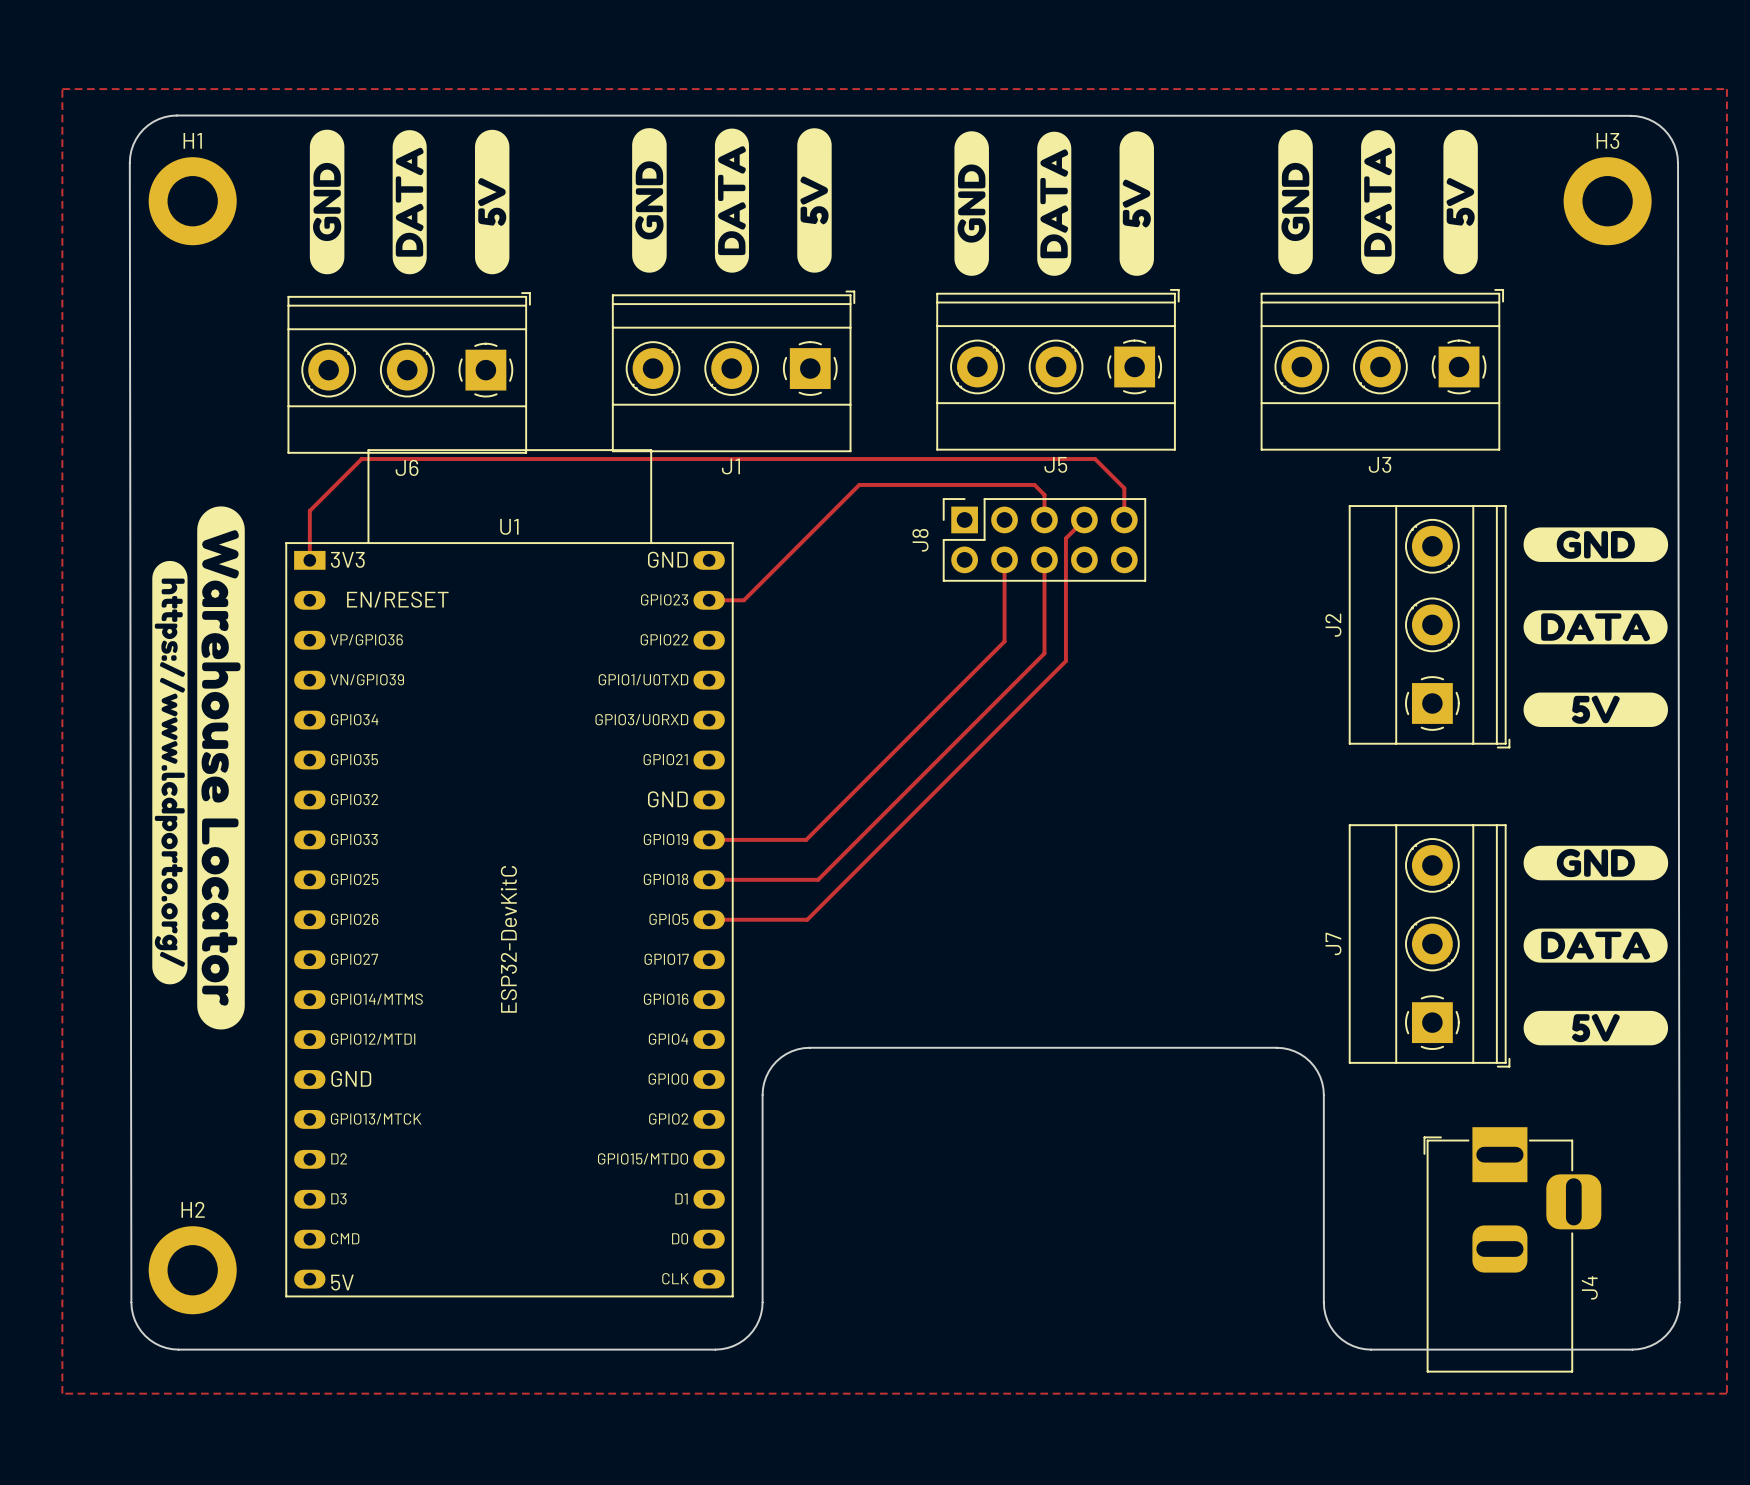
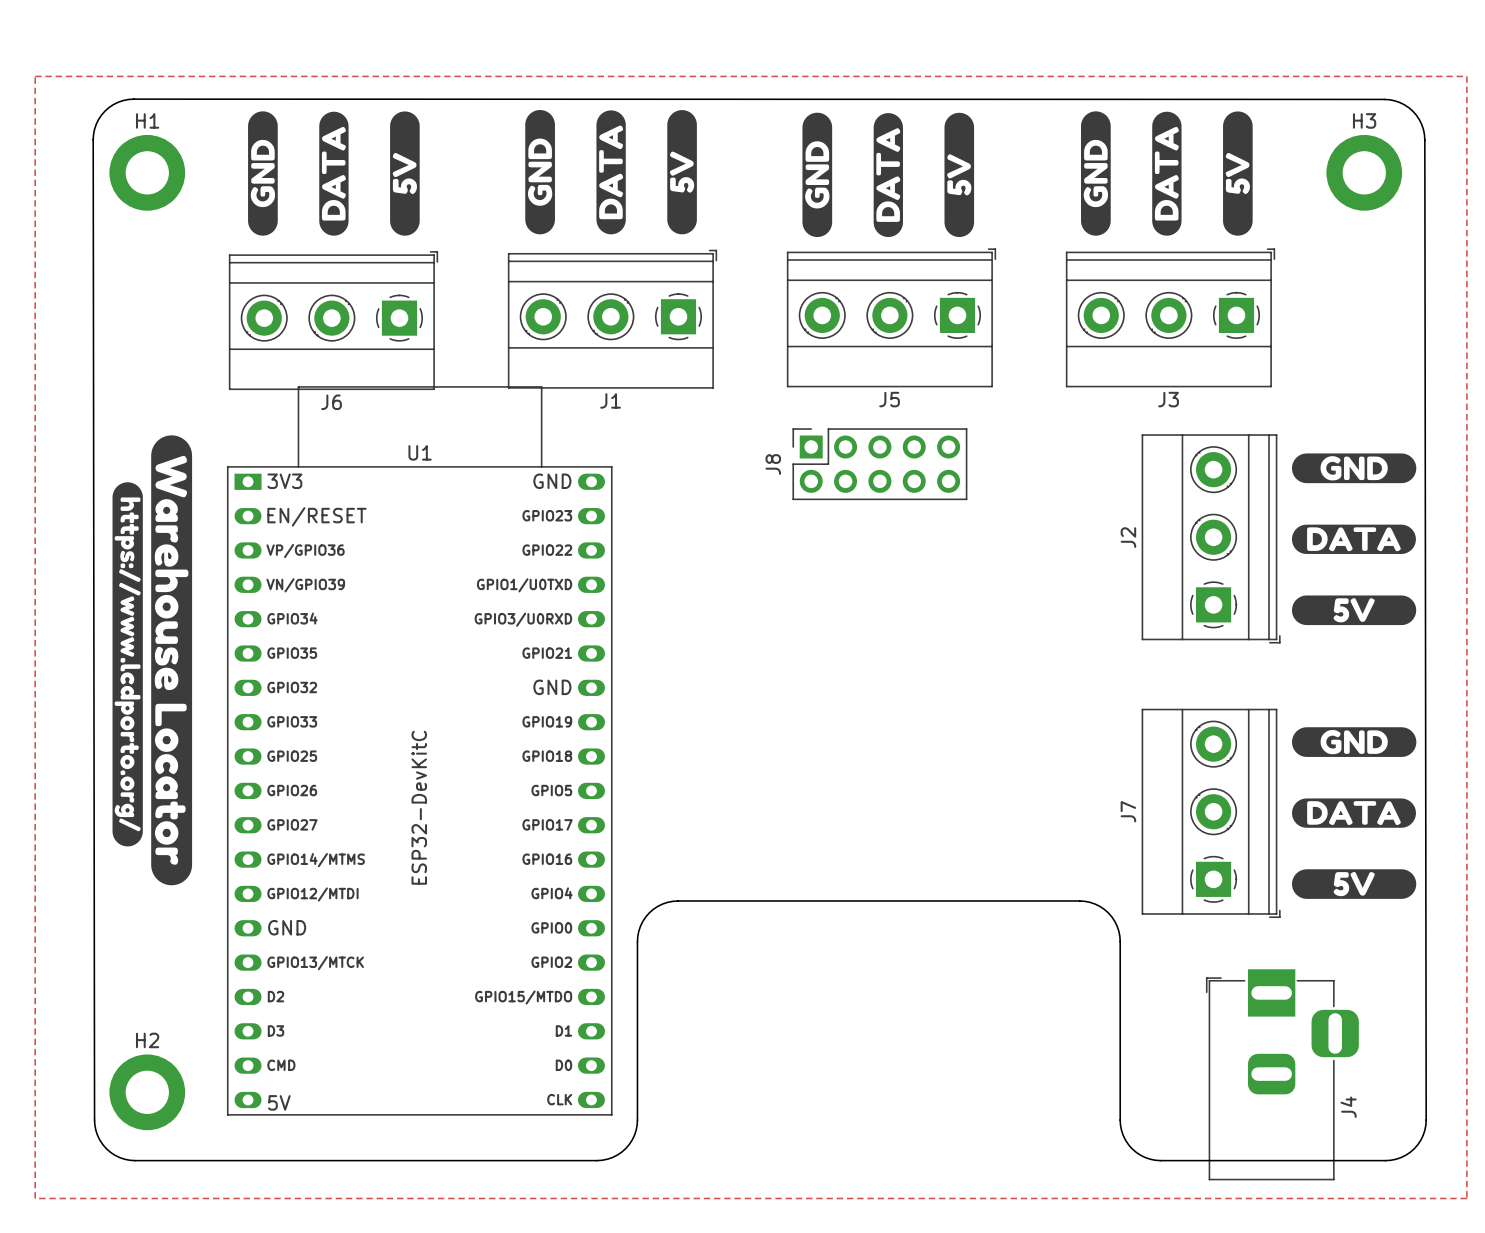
track: (1044, 519) (1044, 494) (1034, 484) (859, 484) (743, 600) (709, 600) -> none
track: (1084, 519) (1065, 538) (1065, 661) (807, 919) (709, 919) -> none
track: (1124, 519) (1124, 488) (1095, 459) (361, 459) (309, 510) (309, 560) -> none
track: (1004, 559) (1004, 641) (806, 839) (709, 839) -> none
track: (1044, 559) (1044, 653) (818, 879) (709, 879) -> none

